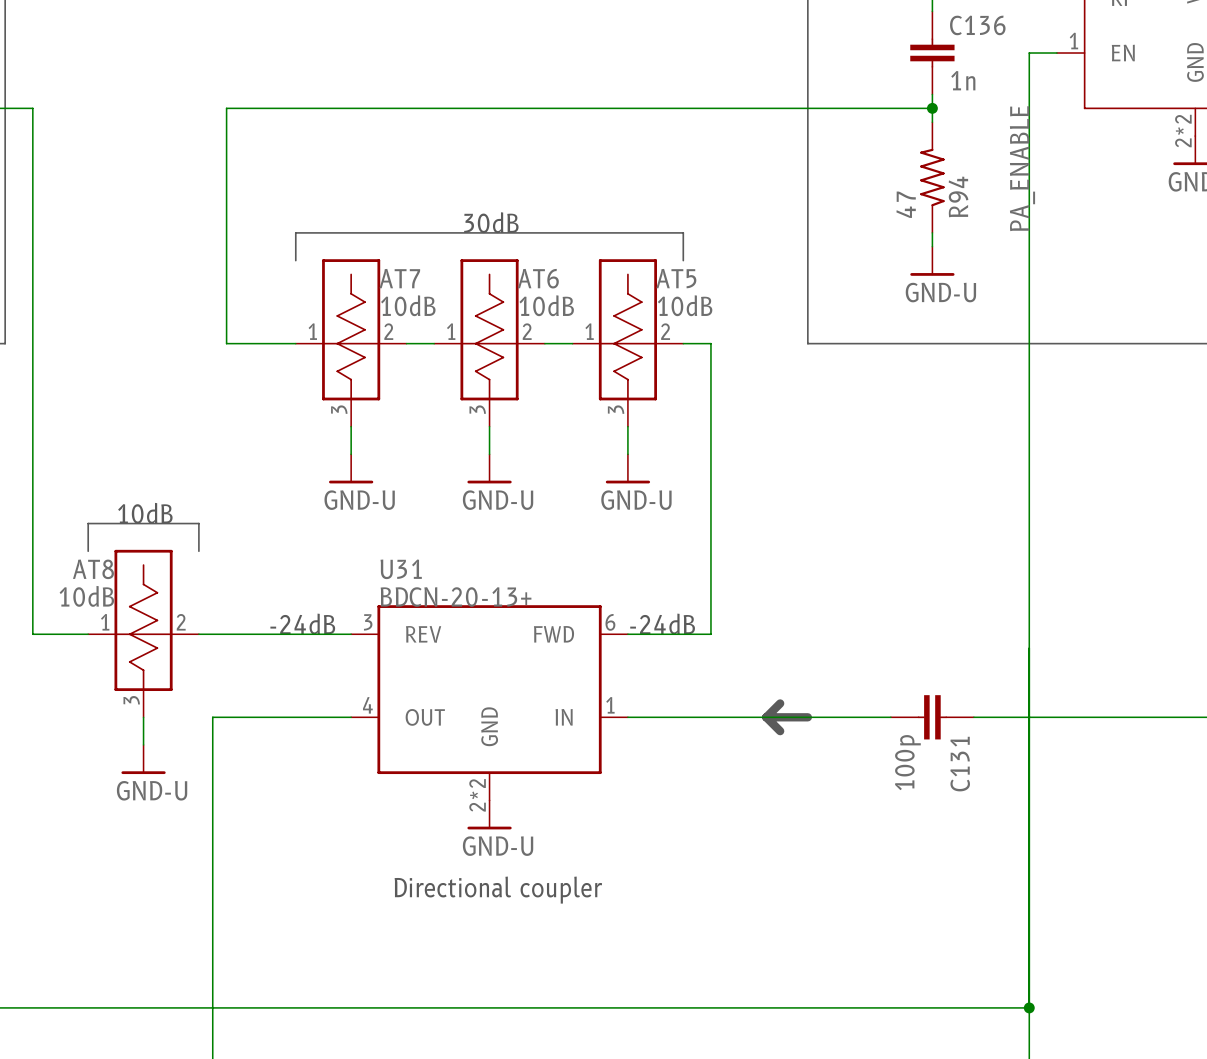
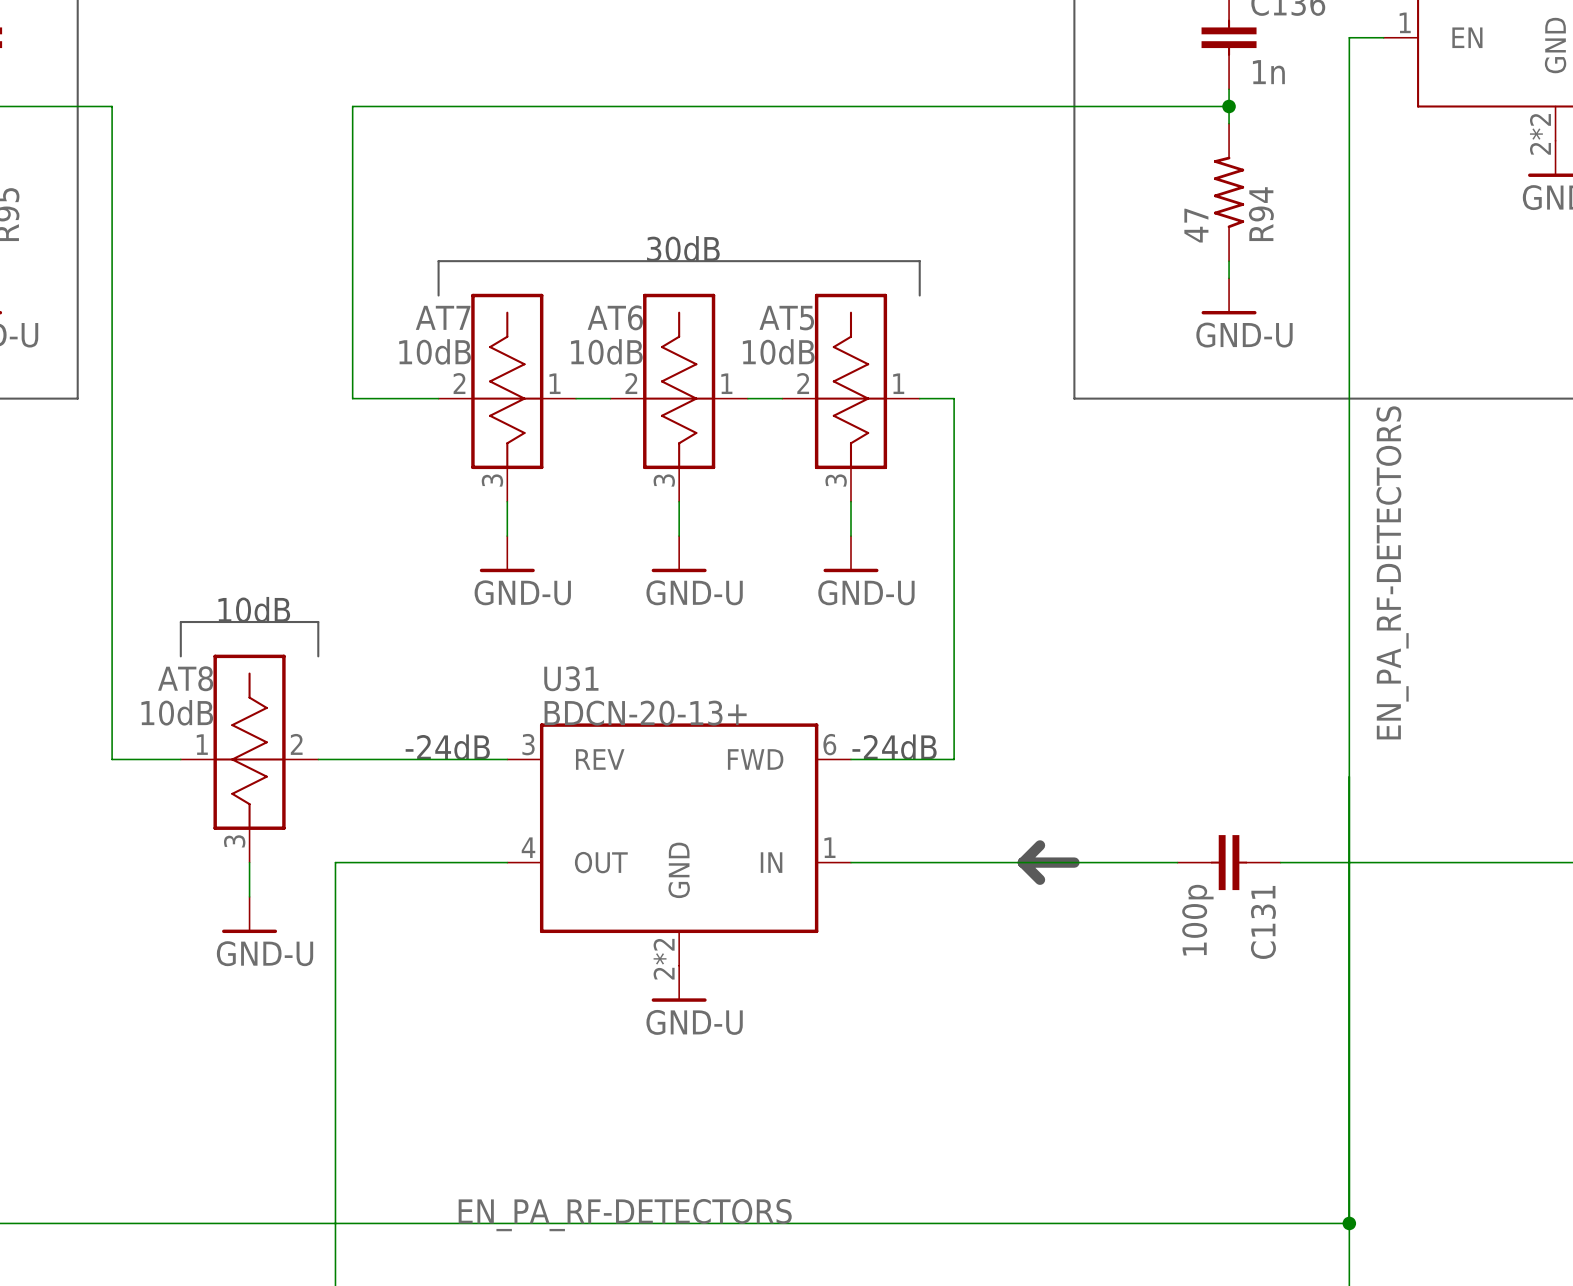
label: PA_ENABLE (1022, 168) -> none
AT7 flip: as is (351, 329) -> left-right (507, 381)
AT6 flip: as is (489, 329) -> left-right (679, 381)
AT5 flip: as is (627, 329) -> left-right (850, 381)
label: none -> EN_PA_RF-DETECTORS (1392, 572)
text: Directional coupler (498, 890) -> none
label: none -> EN_PA_RF-DETECTORS (625, 1215)

